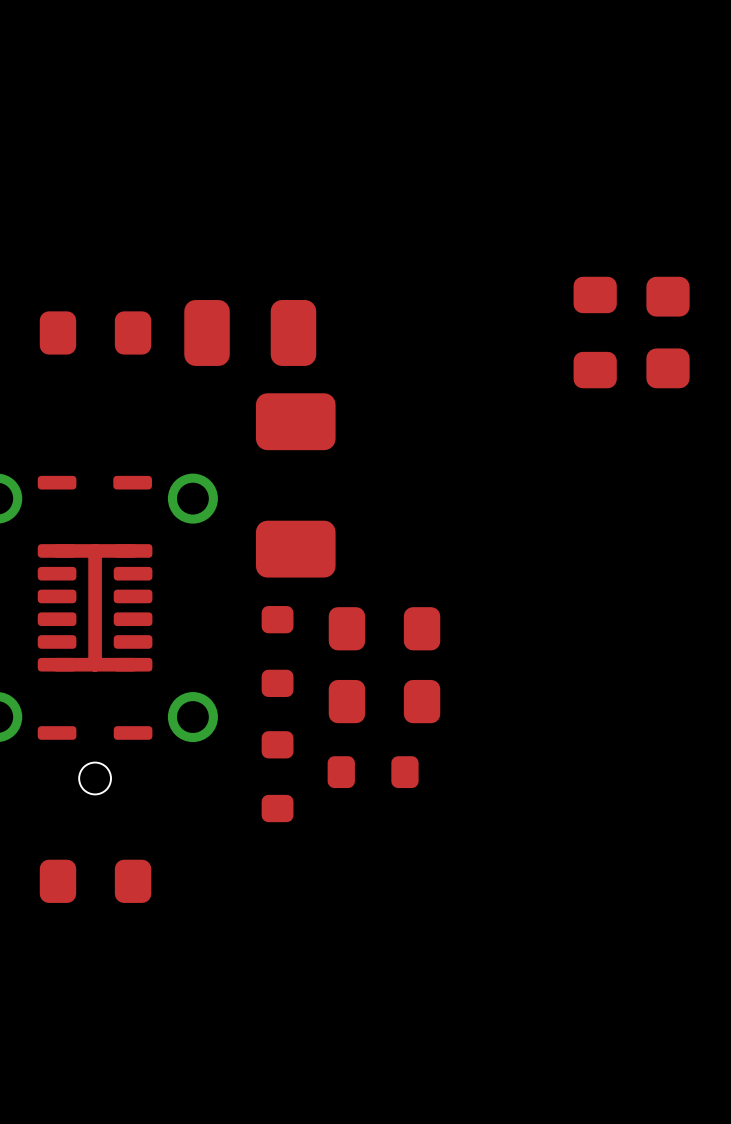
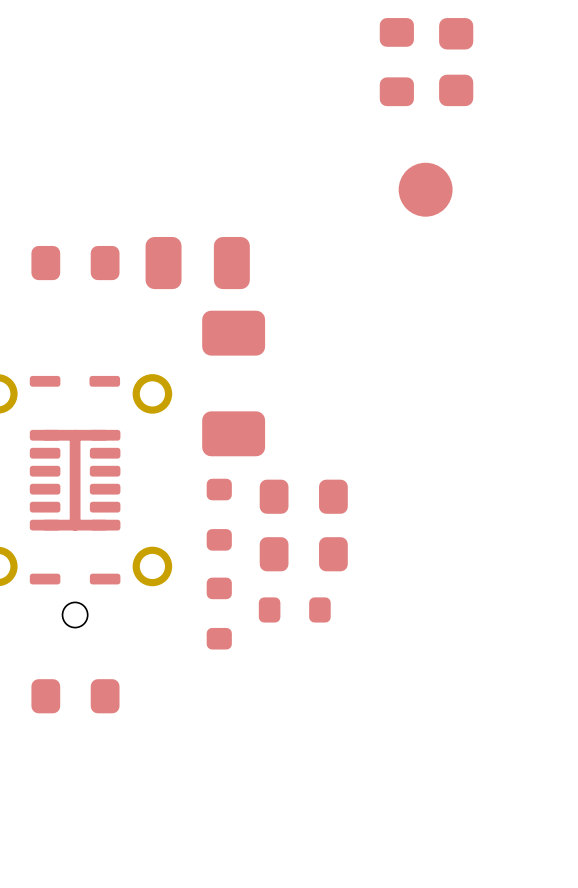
part: none -> (396, 62)
part: none -> (425, 189)
part: (595, 332) -> none
part position: (668, 332) -> (456, 62)

